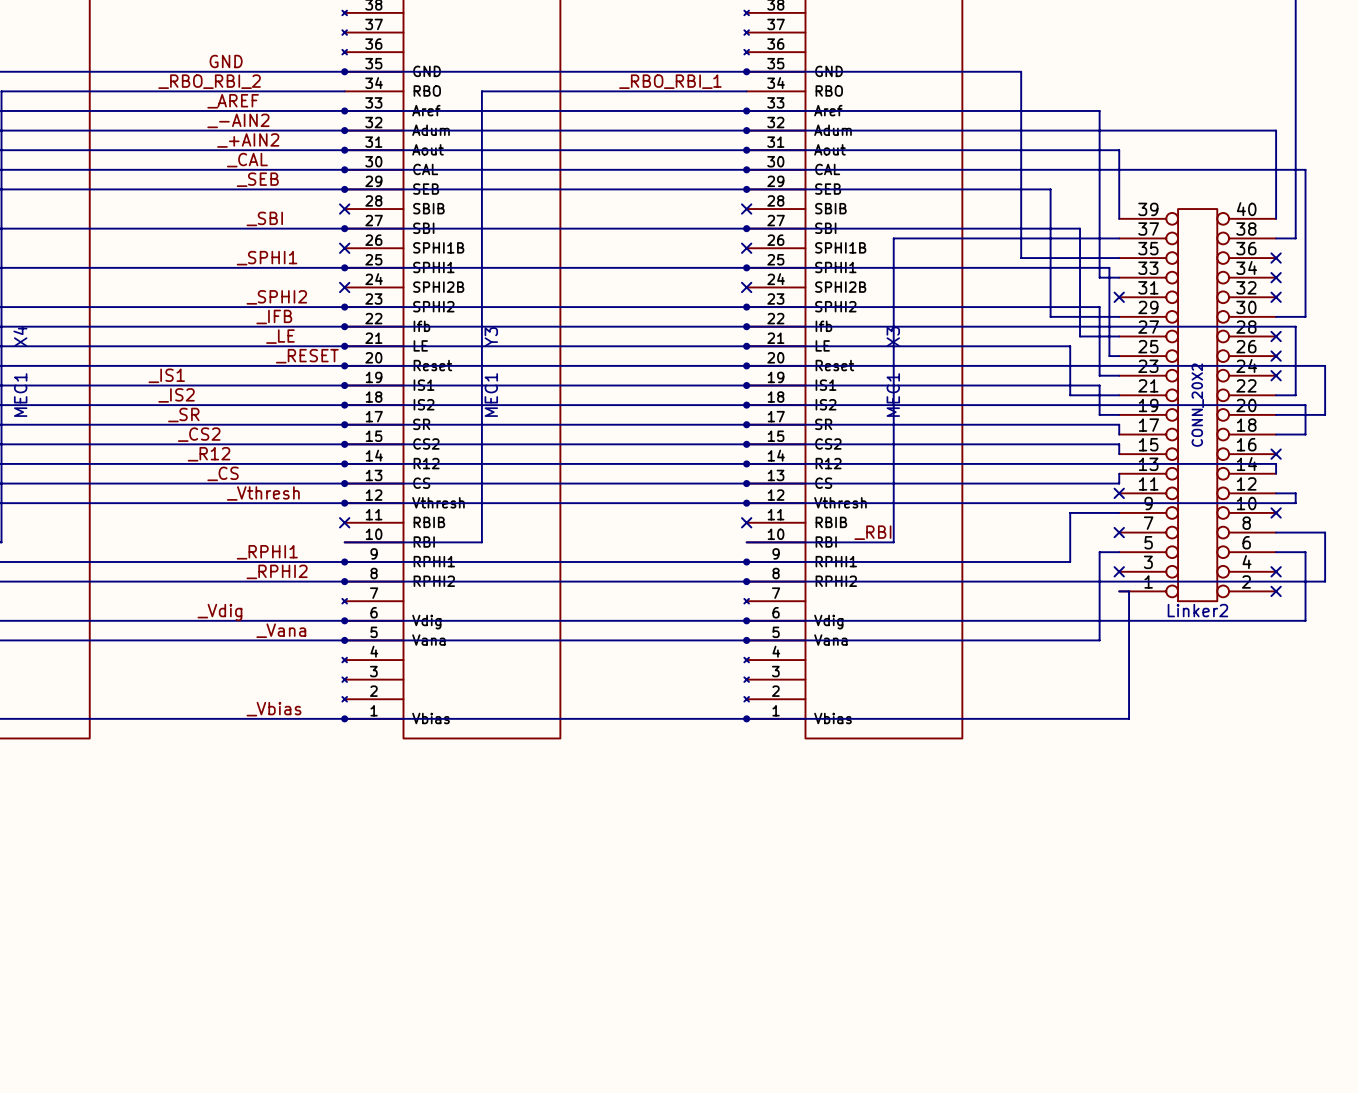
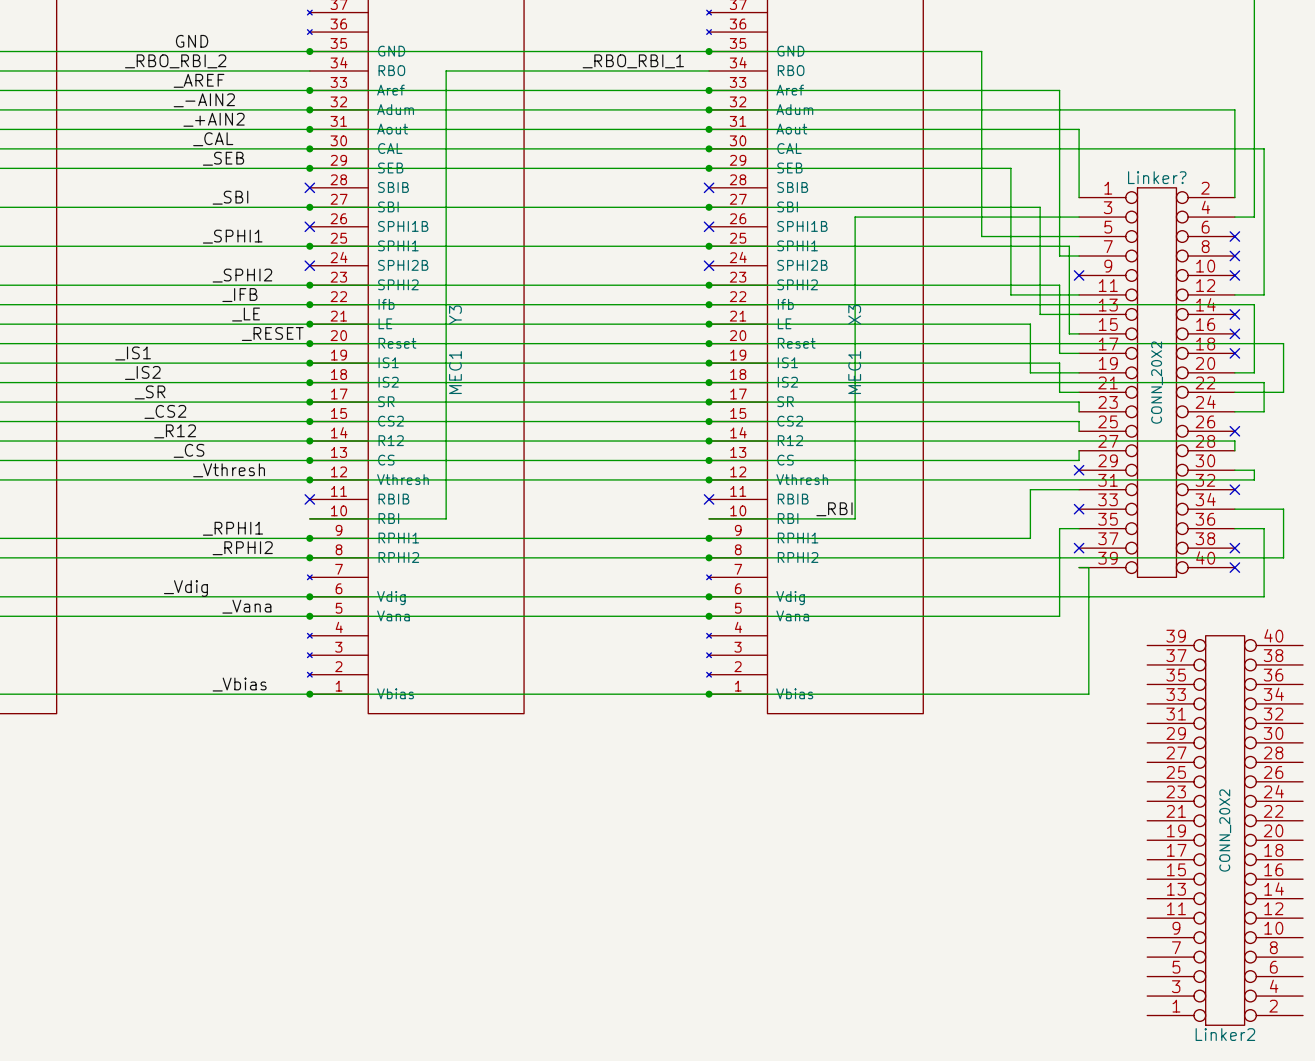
Linker2 position: (1197, 405) -> (1225, 830)
Linker?: none -> CONN_20X2 (1156, 382)

